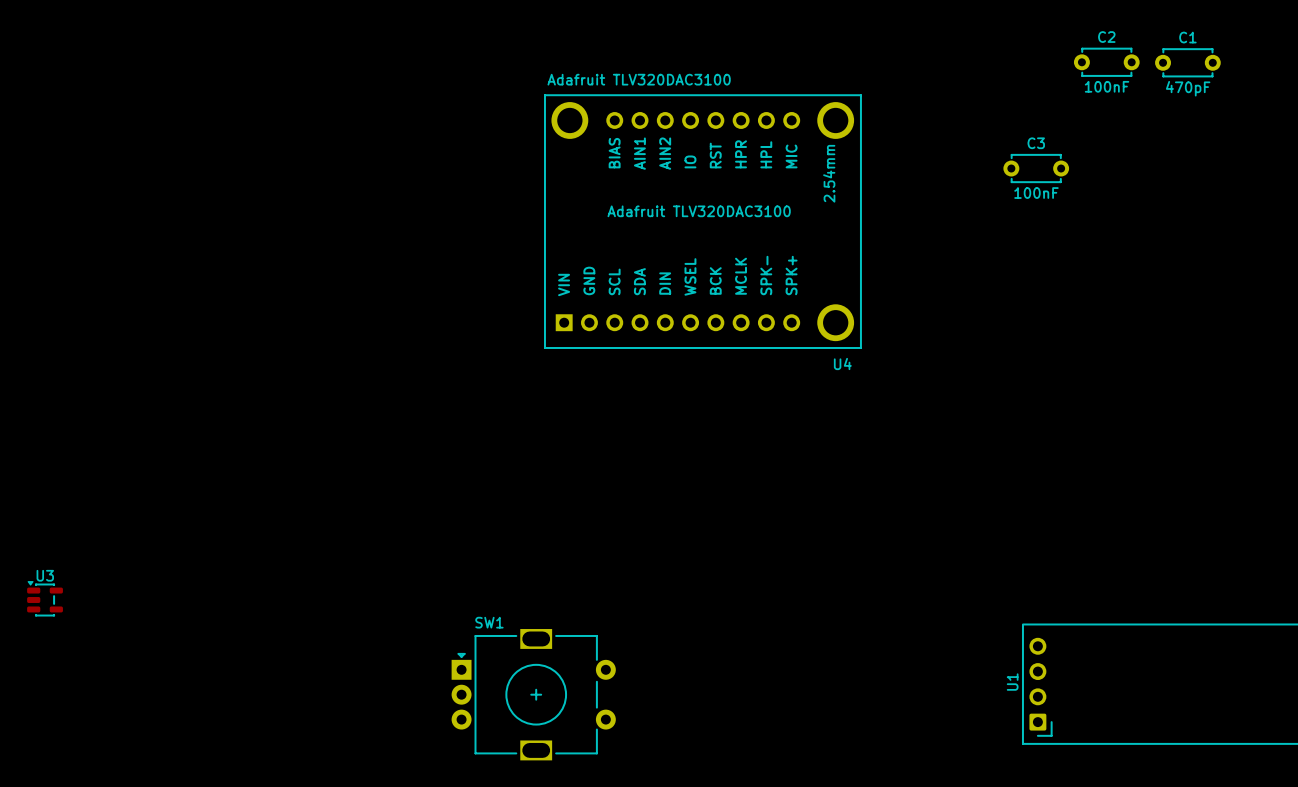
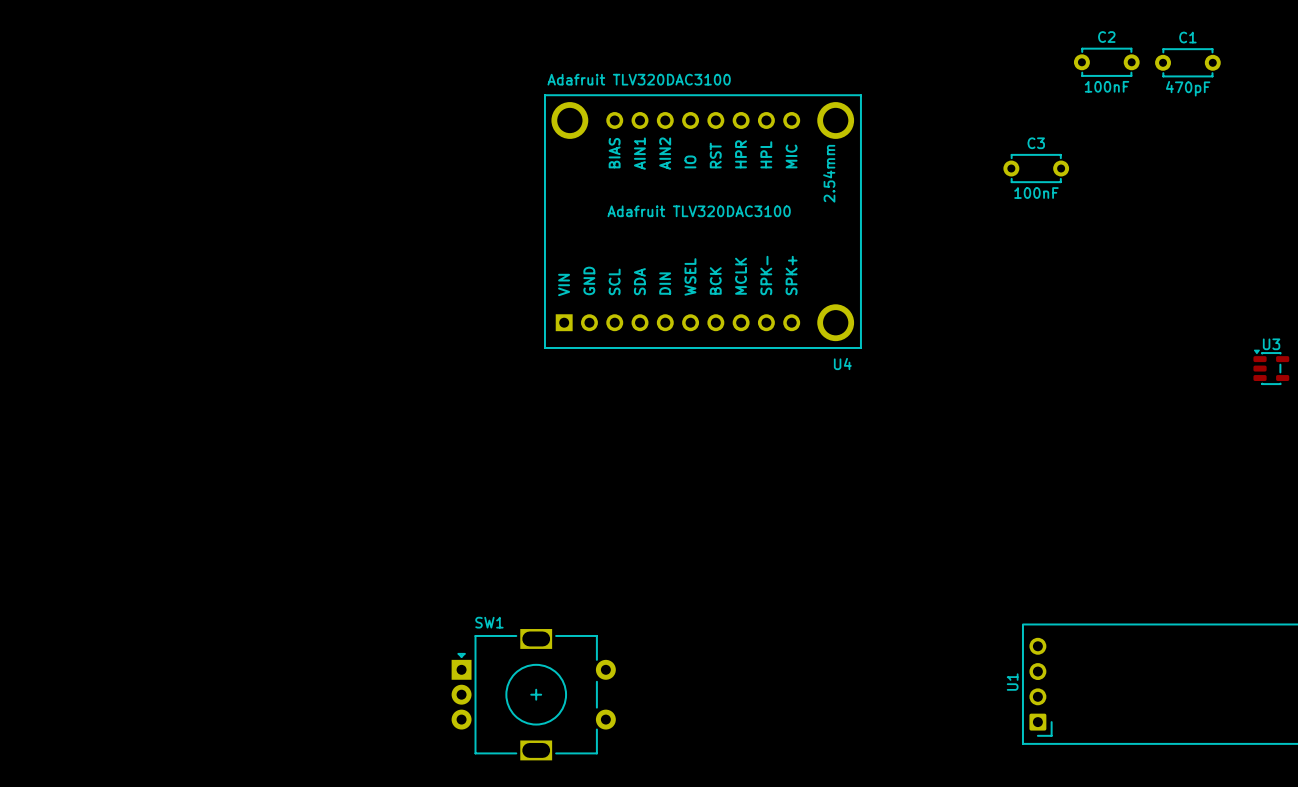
U3 position: (45, 598) -> (1271, 367)

